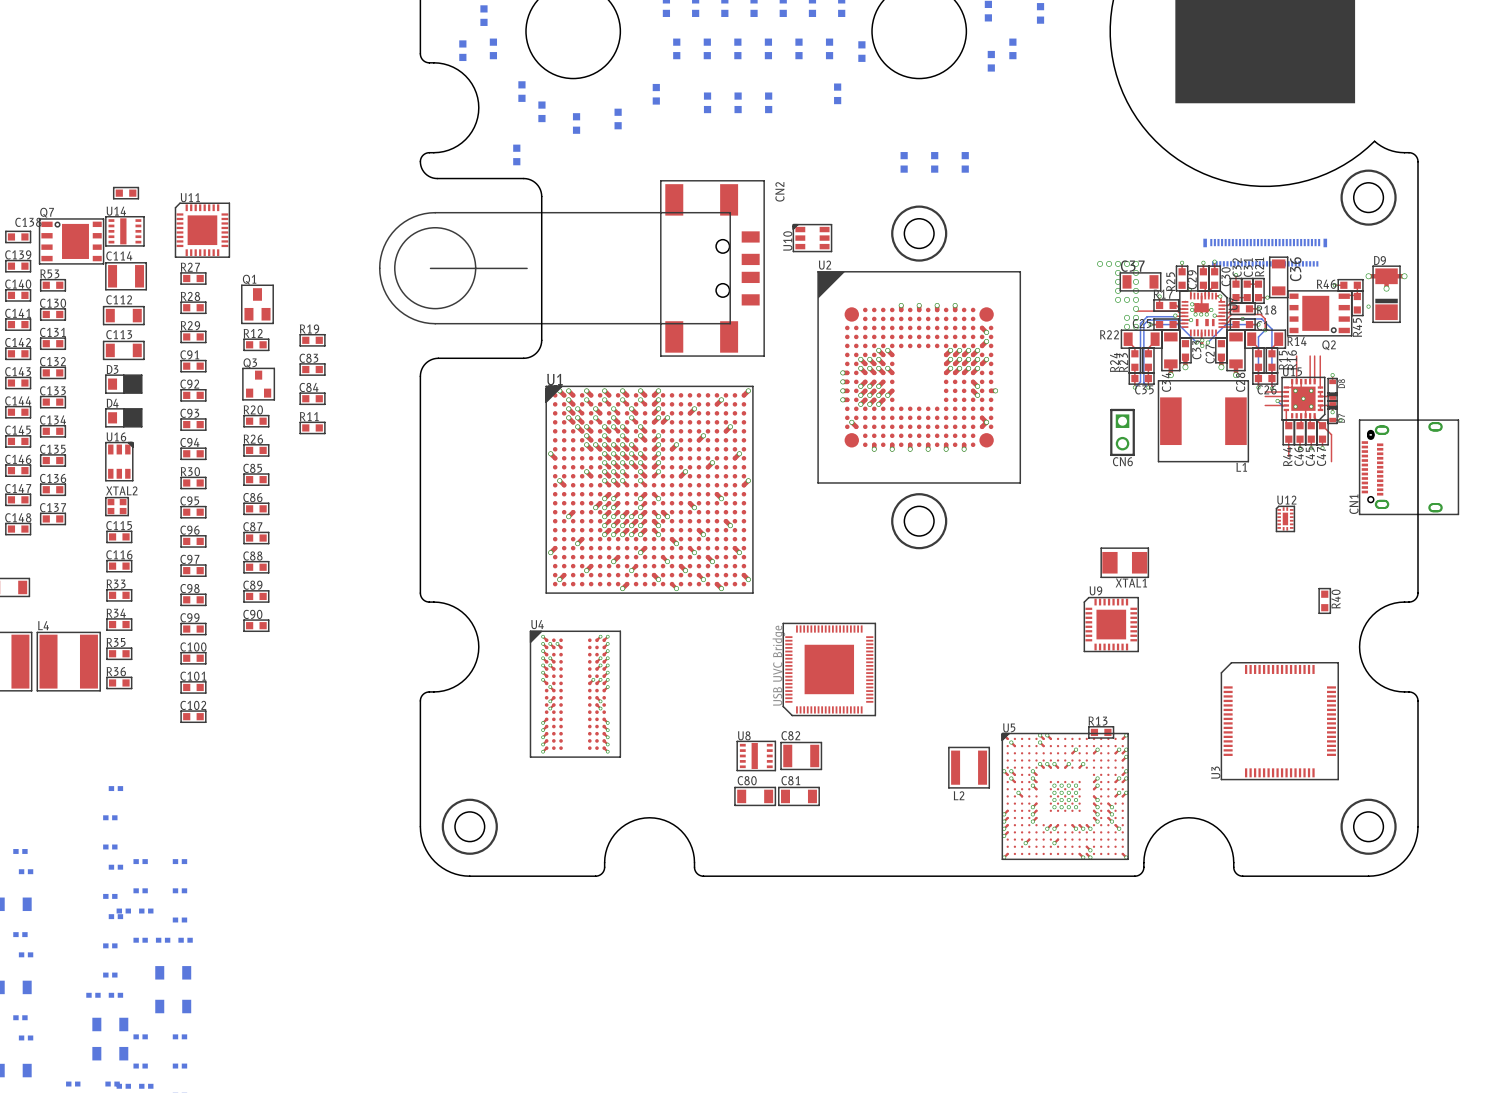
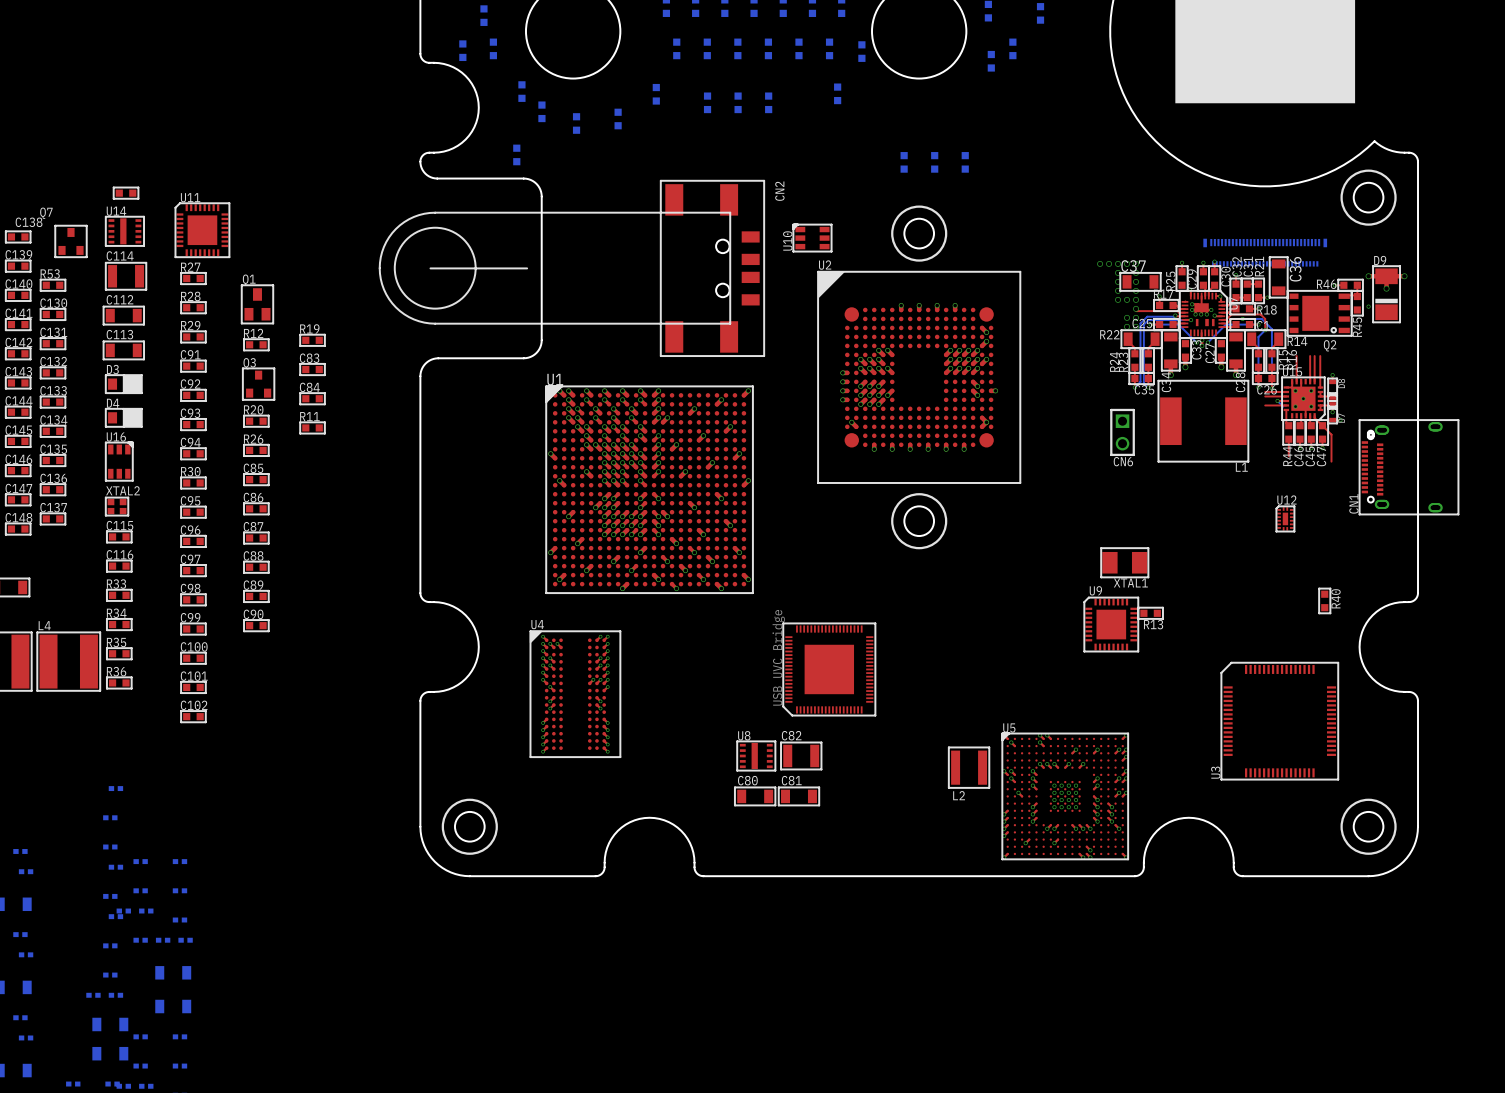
Q7 footprint: [38, 218, 105, 265] -> [54, 225, 88, 258]
R13 name position: R13 (1098, 721) -> R13 (1153, 624)
R13 position: (1101, 732) -> (1150, 613)

